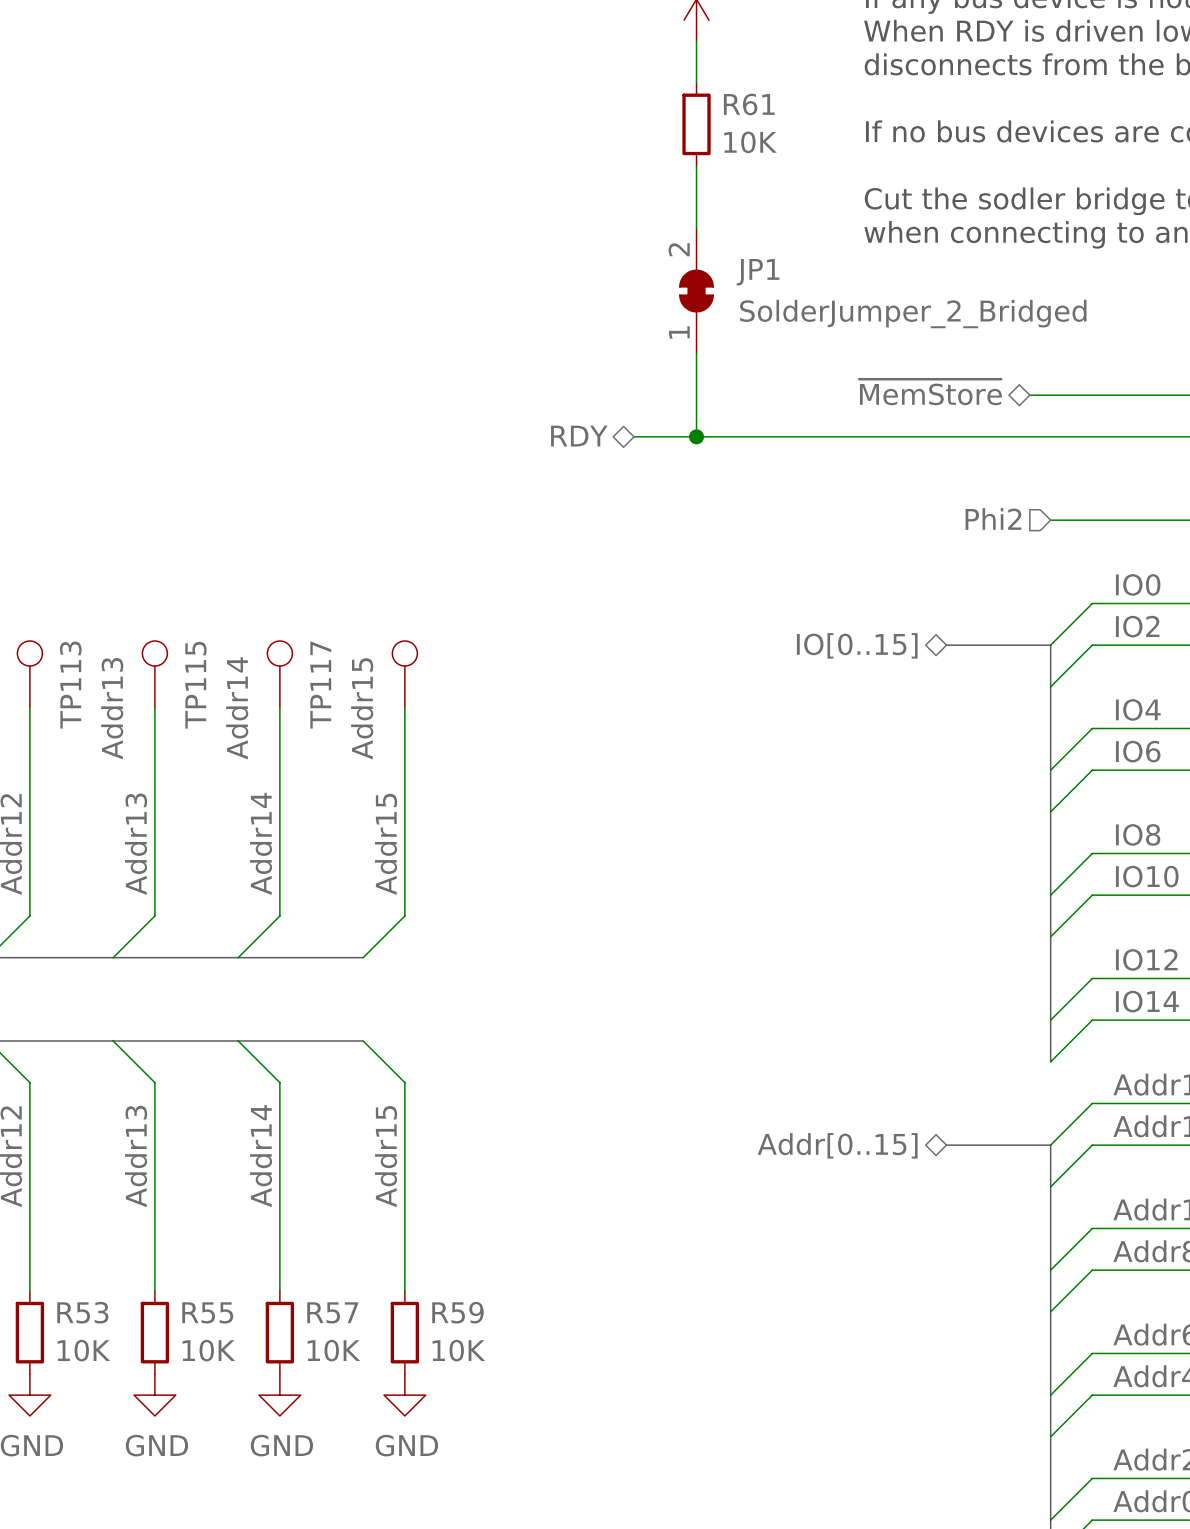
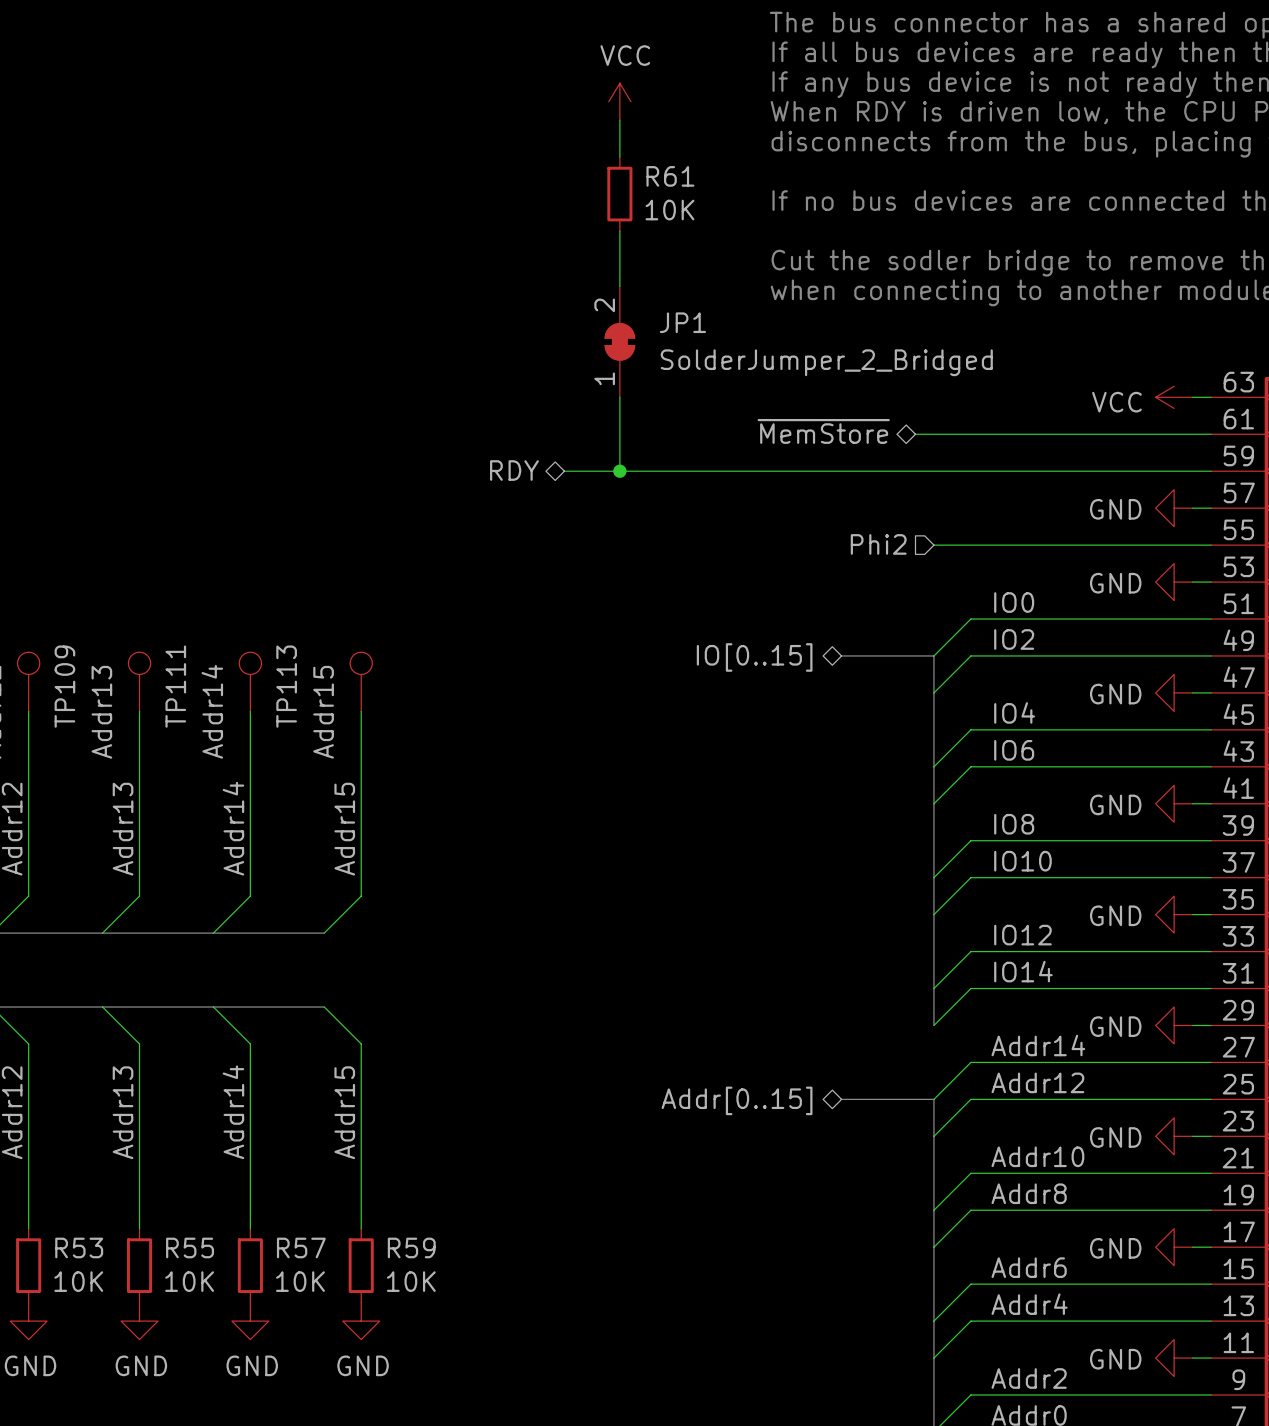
TP113 name: TP113 (70, 685) -> TP109 (64, 686)
TP115 name: TP115 (195, 685) -> TP111 (175, 686)
TP117 name: TP117 (320, 685) -> TP113 (286, 686)

